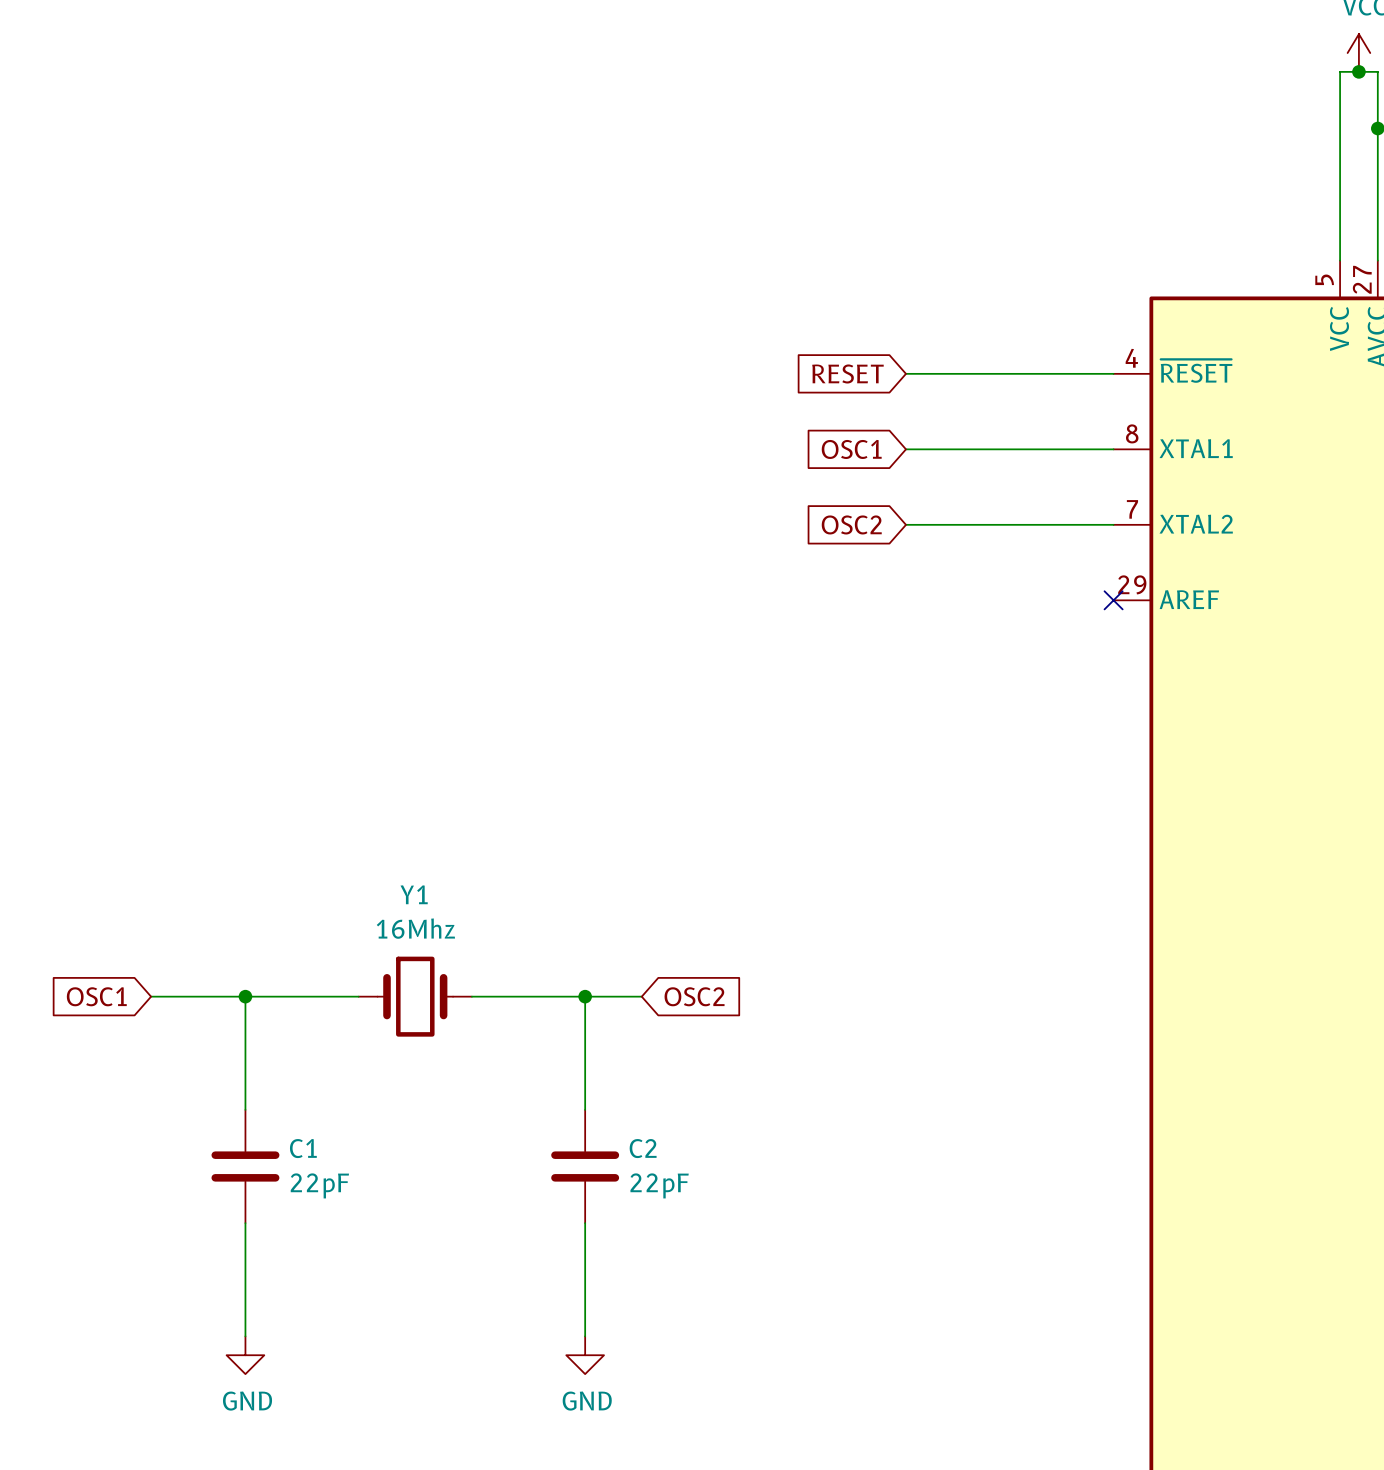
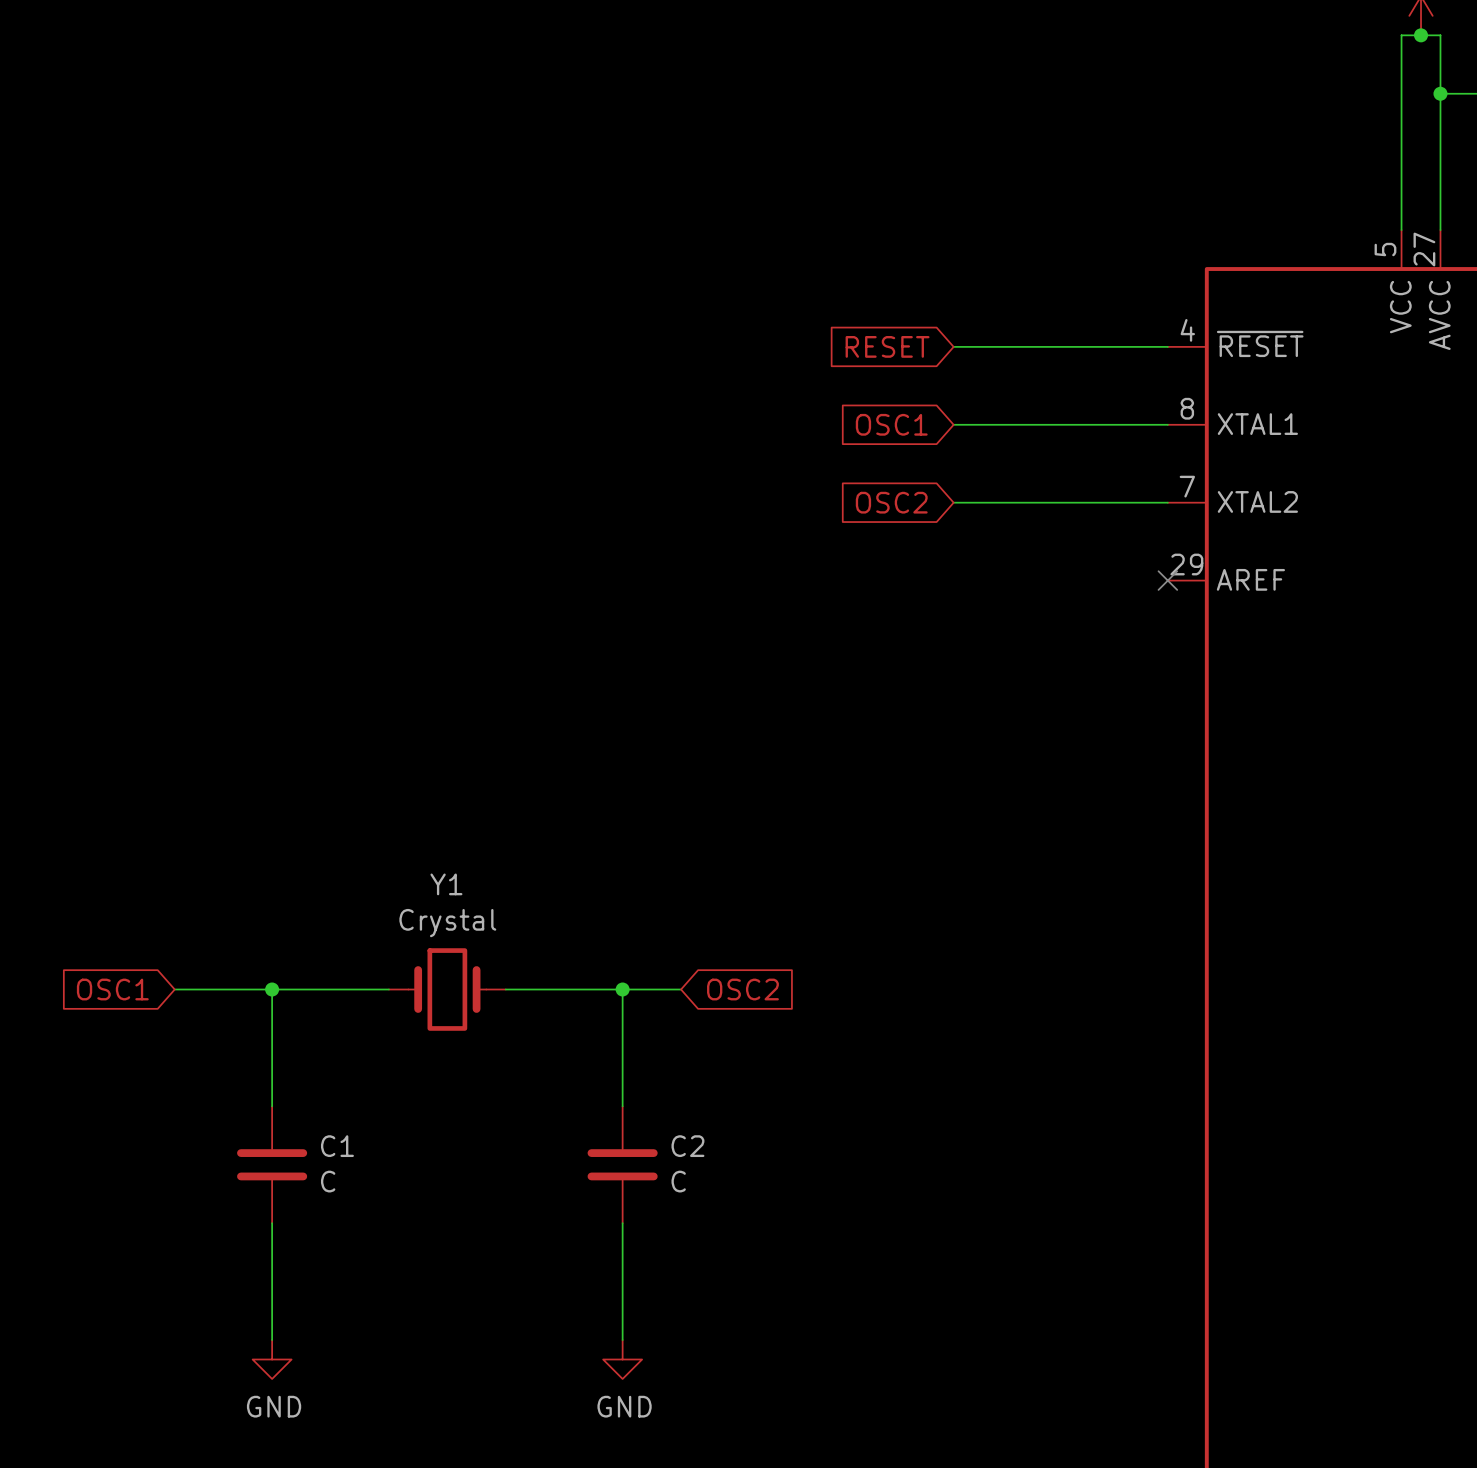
Y1 value: 16Mhz (415, 928) -> Crystal (447, 923)
C1 value: 22pF (319, 1185) -> C (328, 1181)
C2 value: 22pF (659, 1185) -> C (678, 1181)

